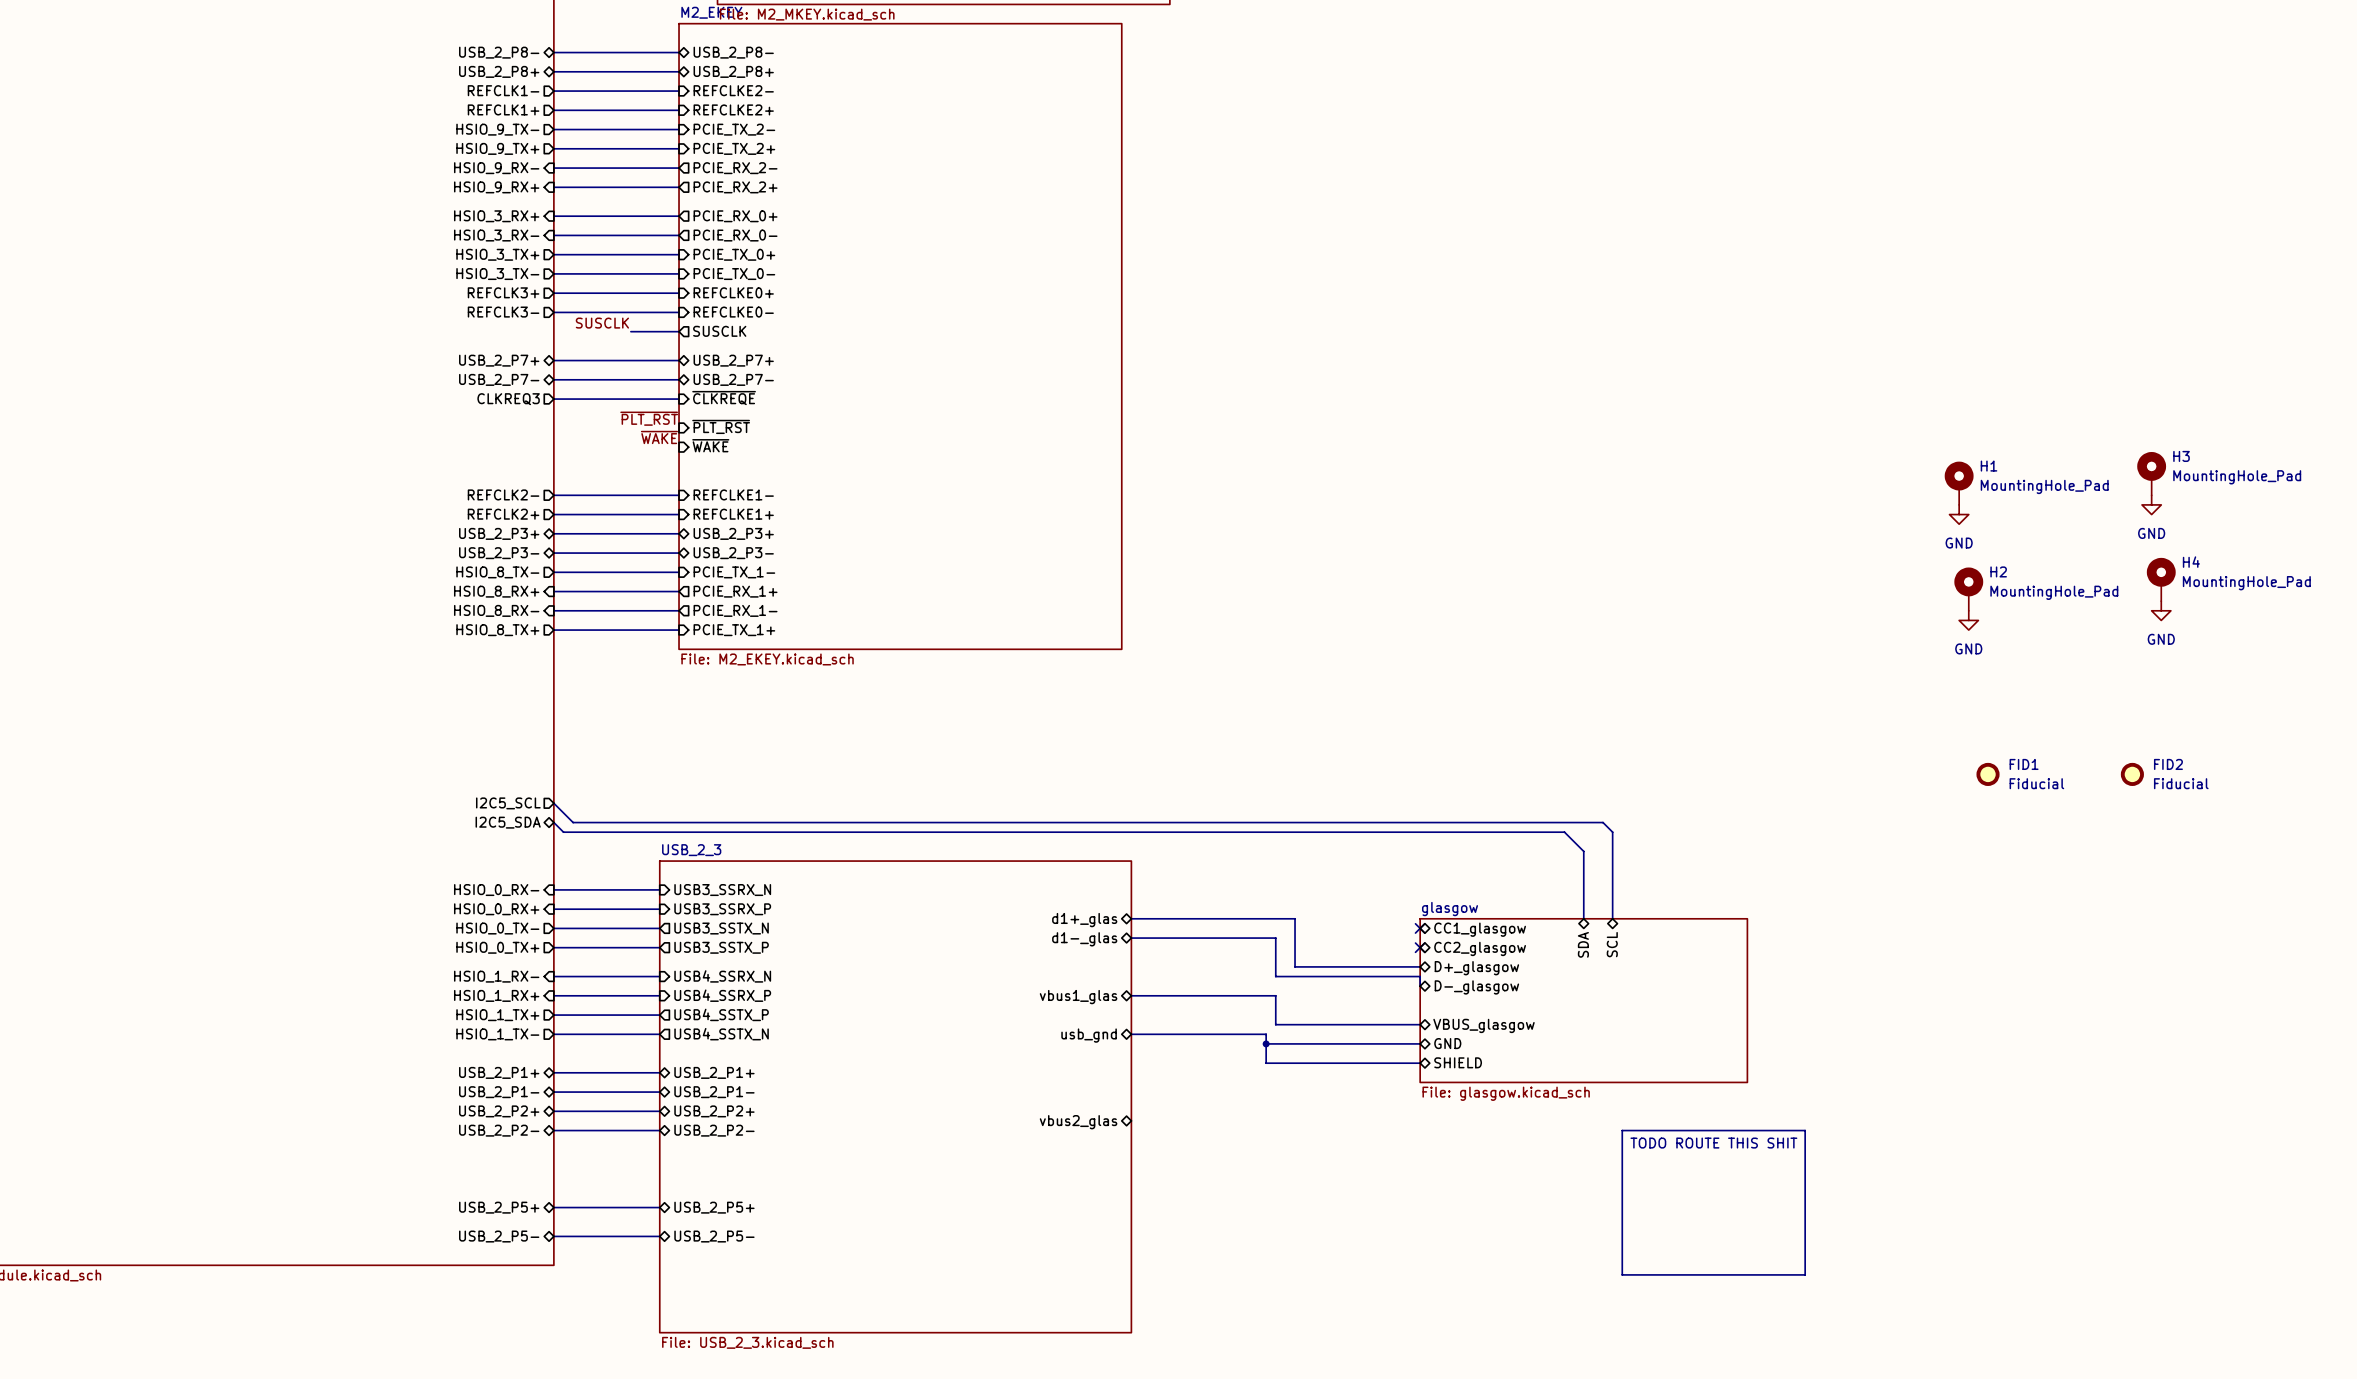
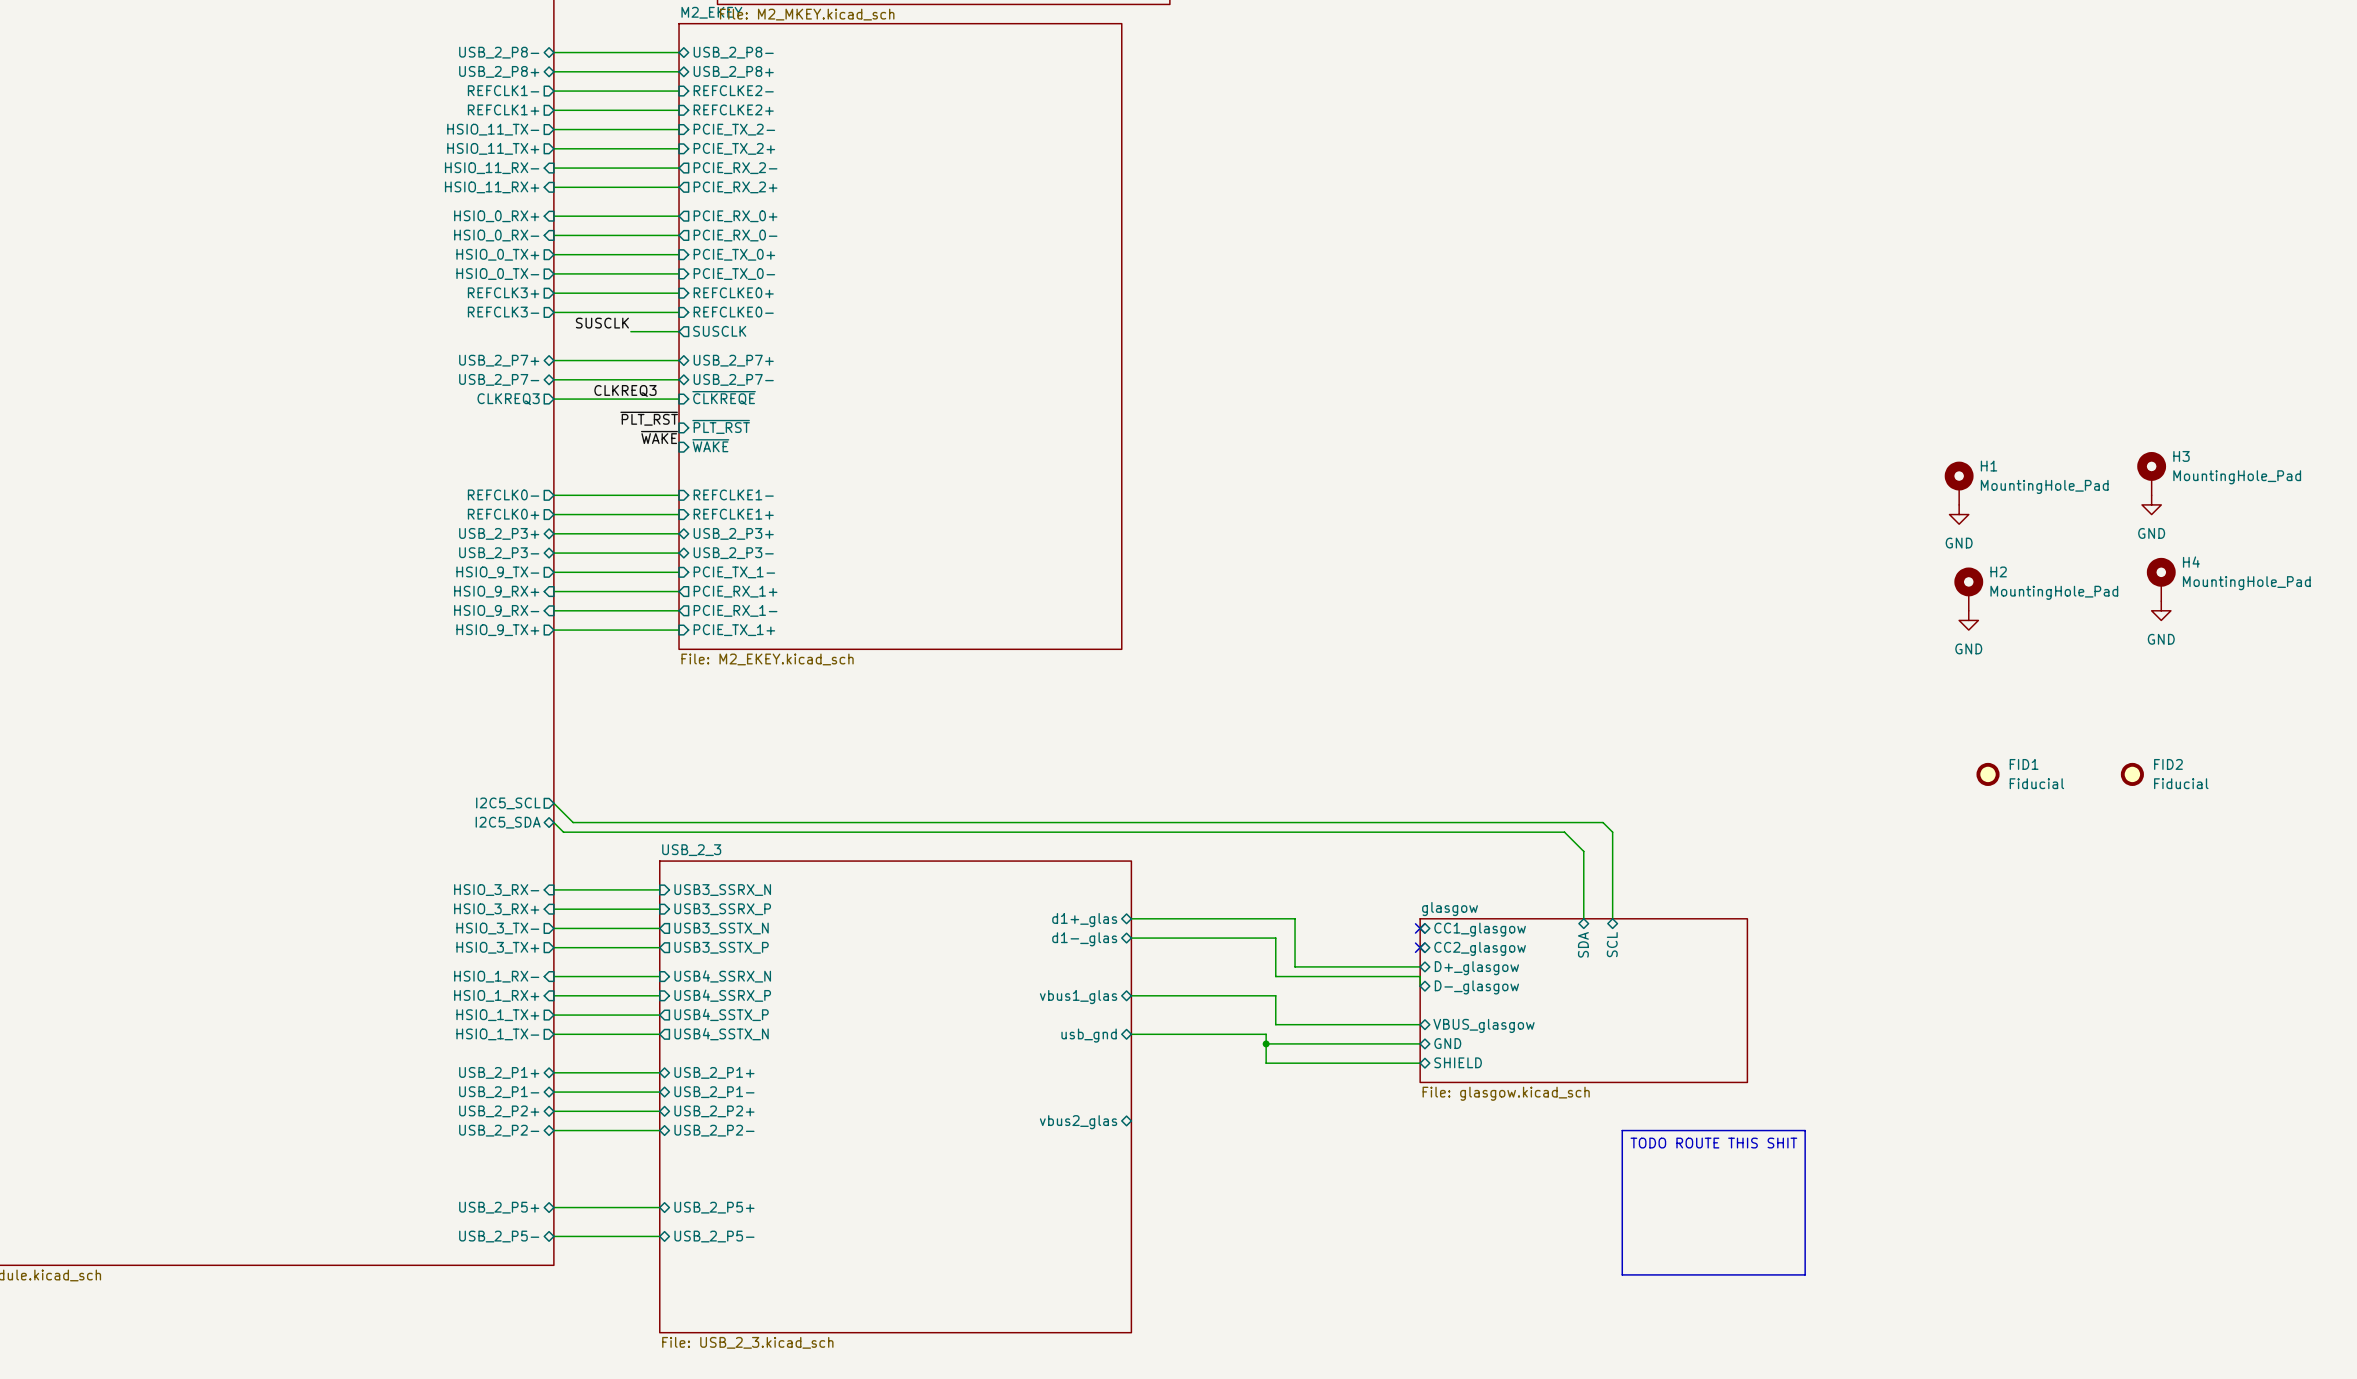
sheet pin: HSIO_9_TX- (497, 129) -> HSIO_11_TX- (493, 129)
sheet pin: HSIO_9_TX+ (497, 148) -> HSIO_11_TX+ (493, 148)
sheet pin: HSIO_9_RX- (496, 168) -> HSIO_11_RX- (492, 168)
sheet pin: HSIO_9_RX+ (496, 187) -> HSIO_11_RX+ (492, 187)
sheet pin: HSIO_3_RX+ (496, 216) -> HSIO_0_RX+ (496, 216)
sheet pin: HSIO_3_RX- (496, 235) -> HSIO_0_RX- (496, 235)
sheet pin: HSIO_3_TX+ (497, 254) -> HSIO_0_TX+ (497, 254)
sheet pin: HSIO_3_TX- (497, 274) -> HSIO_0_TX- (497, 274)
label: none -> CLKREQ3 (625, 390)
sheet pin: REFCLK2- (503, 494) -> REFCLK0- (503, 494)
sheet pin: REFCLK2+ (503, 514) -> REFCLK0+ (503, 514)
sheet pin: HSIO_8_TX- (497, 572) -> HSIO_9_TX- (497, 572)
sheet pin: HSIO_8_RX+ (496, 591) -> HSIO_9_RX+ (496, 591)
sheet pin: HSIO_8_RX- (496, 610) -> HSIO_9_RX- (496, 610)
sheet pin: HSIO_8_TX+ (497, 630) -> HSIO_9_TX+ (497, 630)
sheet pin: HSIO_0_RX- (496, 890) -> HSIO_3_RX- (496, 890)
sheet pin: HSIO_0_RX+ (496, 909) -> HSIO_3_RX+ (496, 909)
sheet pin: HSIO_0_TX- (497, 928) -> HSIO_3_TX- (497, 928)
sheet pin: HSIO_0_TX+ (497, 947) -> HSIO_3_TX+ (497, 947)

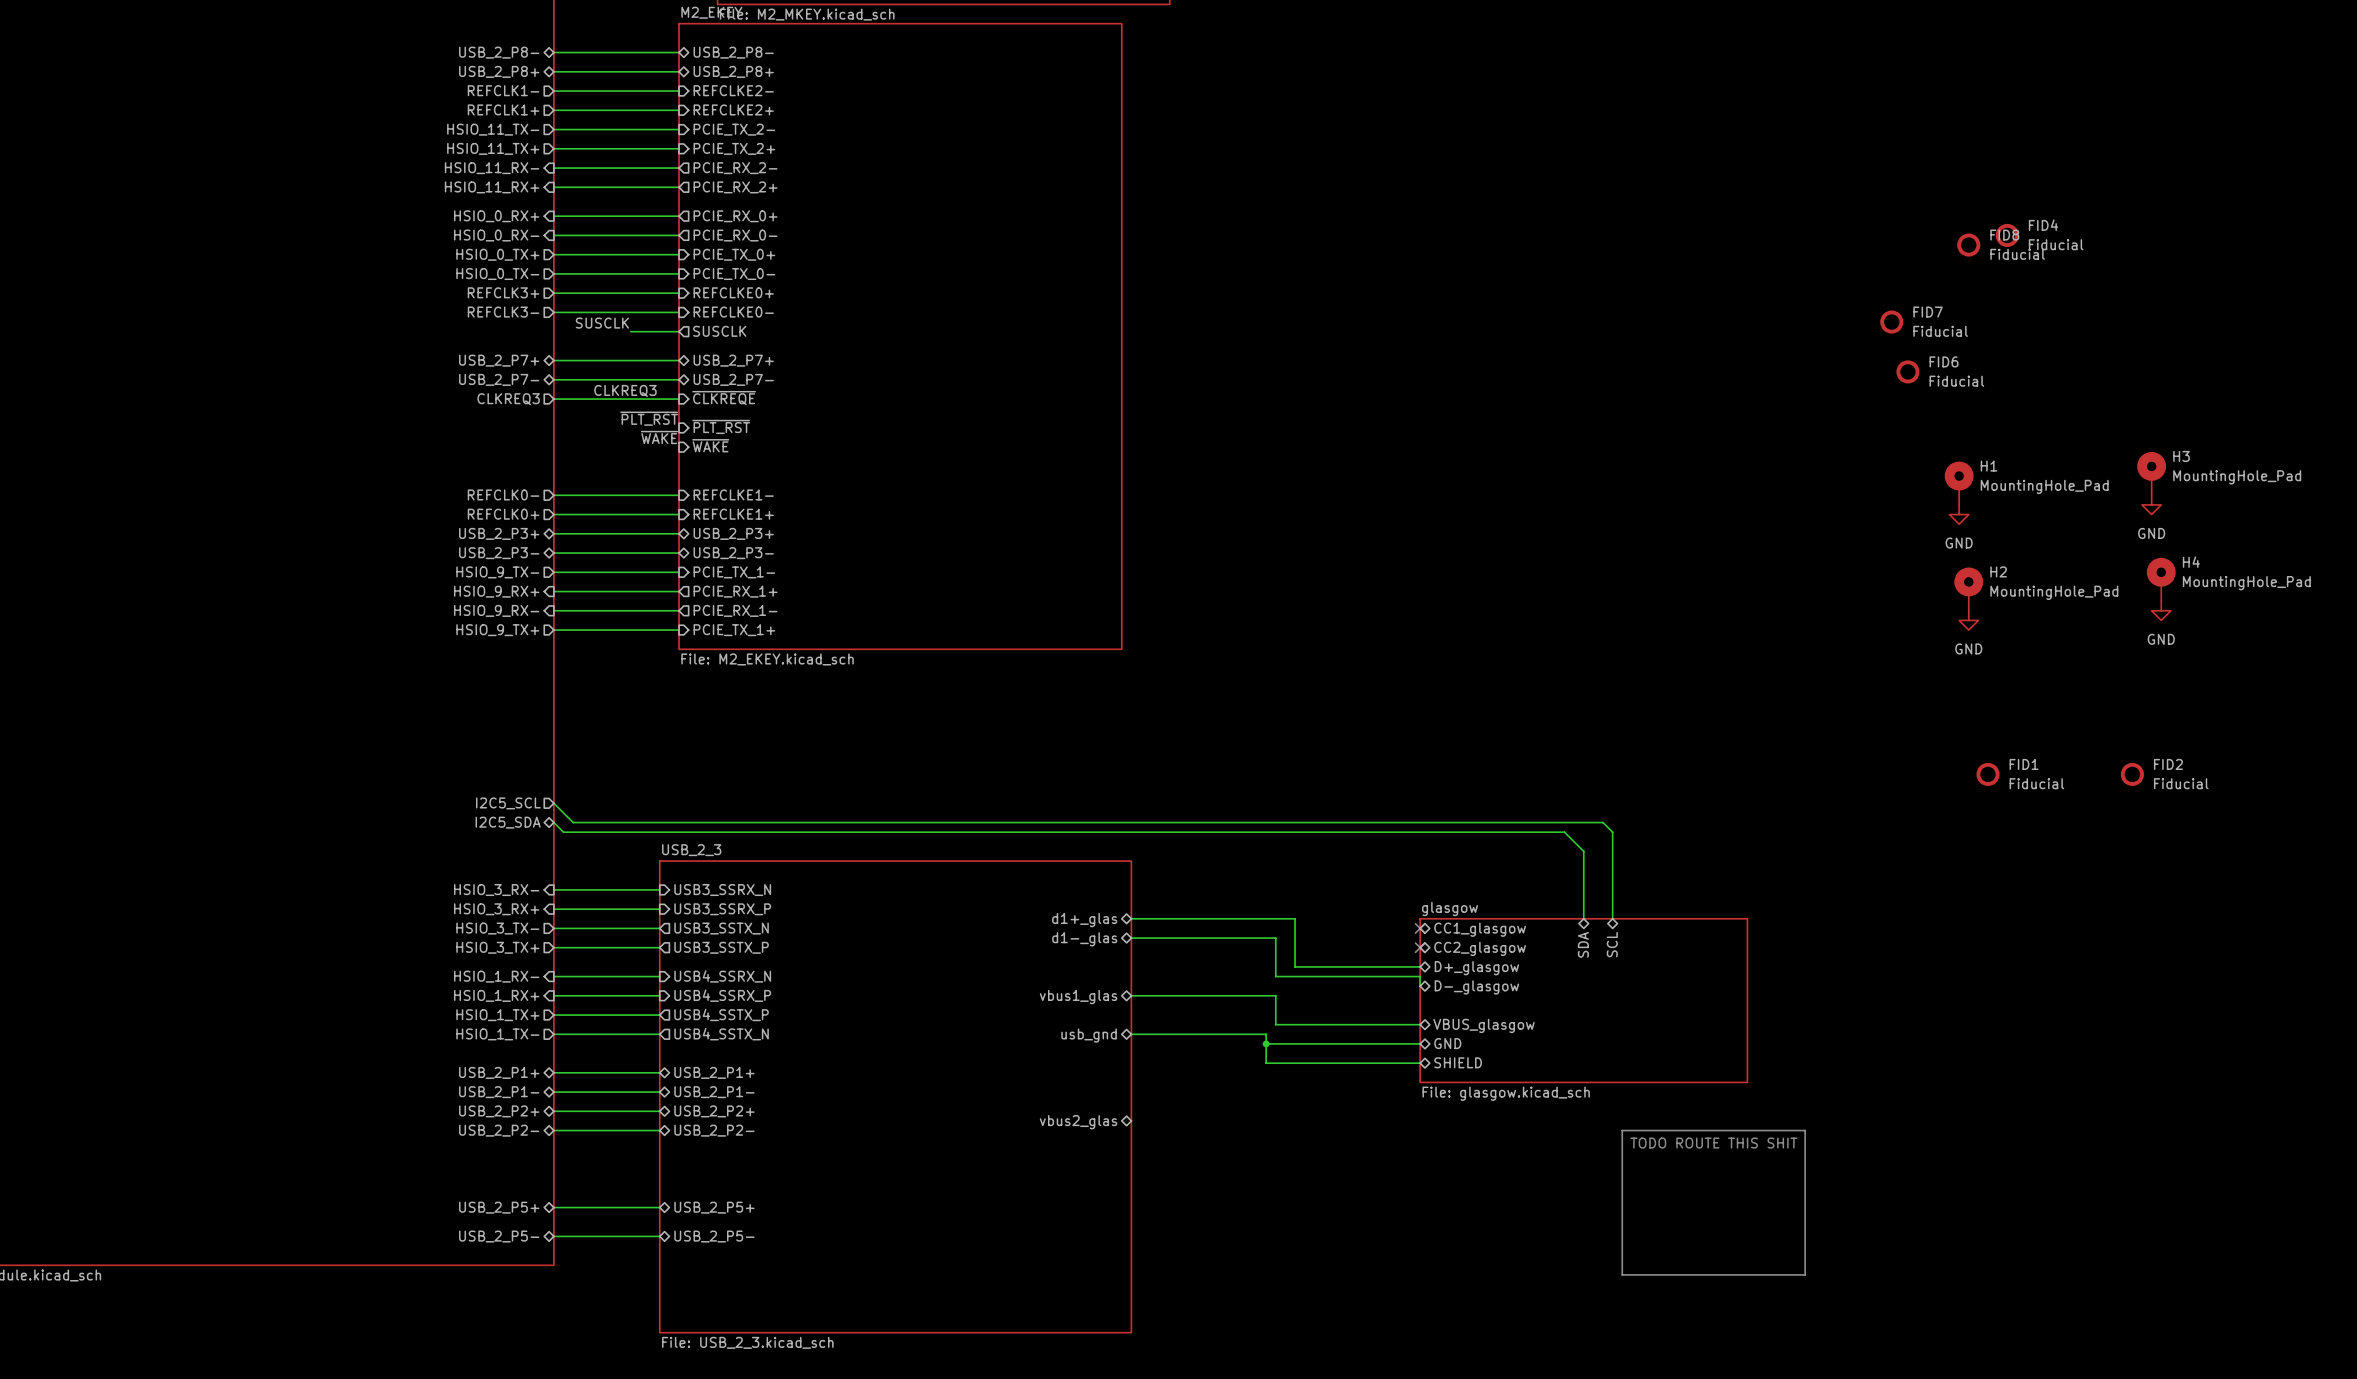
FID4: none -> Fiducial (2007, 235)
FID8: none -> Fiducial (1968, 245)
FID7: none -> Fiducial (1891, 322)
FID6: none -> Fiducial (1907, 371)

